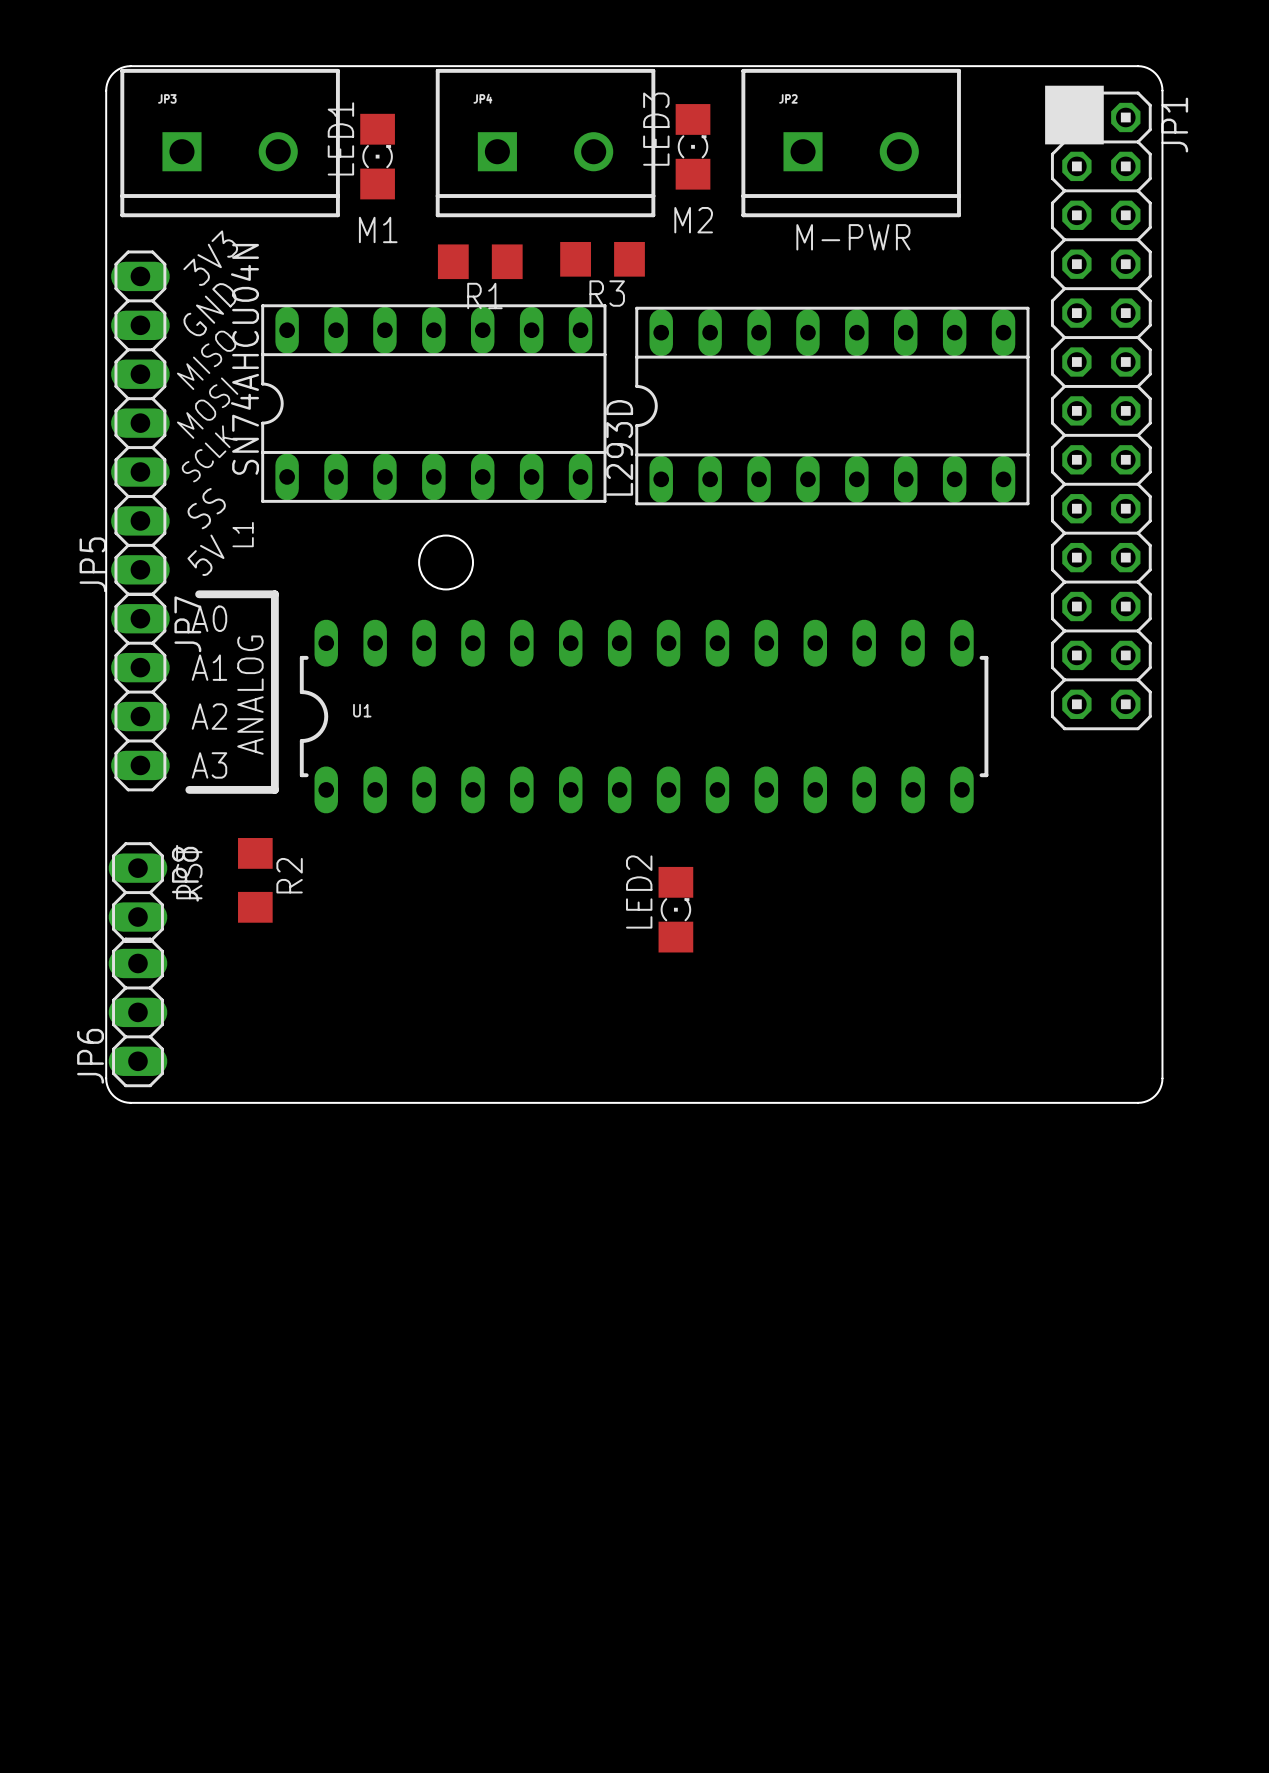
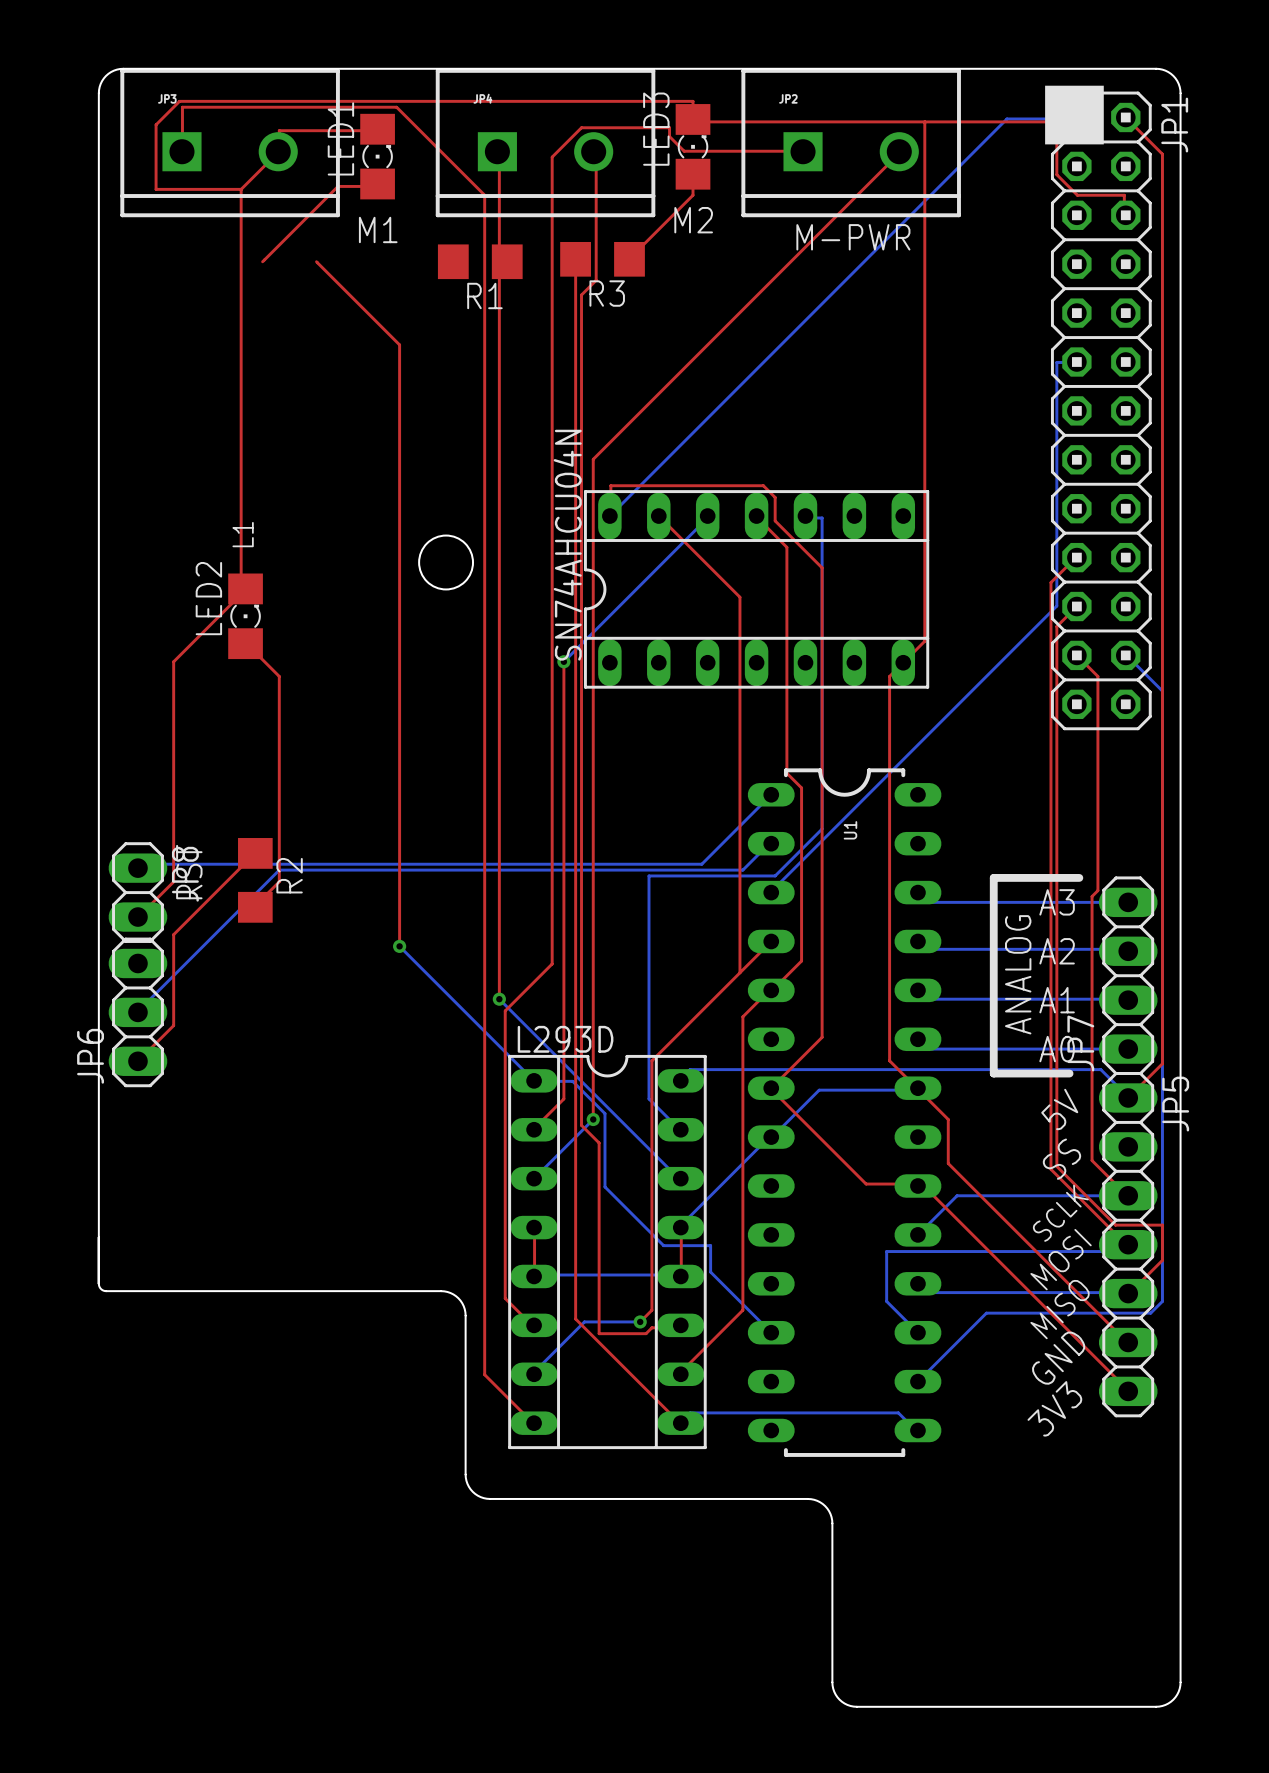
board edge: (130, 66) (1138, 66) (1147, 68) (1155, 73) (1160, 81) (1162, 90) (1162, 1078) (1160, 1087) (1155, 1095) (1147, 1101) (1138, 1102) (130, 1102) (121, 1101) (113, 1095) (108, 1087) (106, 1078) (106, 90) (108, 81) (113, 73) (121, 68) (130, 66) -> (123, 68) (113, 70) (106, 75) (100, 83) (98, 93) (99, 1287) (106, 1291) (441, 1291) (450, 1293) (460, 1300) (465, 1312) (465, 1477) (468, 1486) (477, 1495) (490, 1498) (807, 1498) (820, 1502) (829, 1511) (832, 1520) (832, 1685) (837, 1697) (850, 1705) (1156, 1706) (1168, 1703) (1177, 1694) (1180, 1682) (1180, 93) (1177, 81) (1168, 72) (1156, 68) (123, 68)
bottom track: none -> (1076, 117) (1006, 118) (609, 516)
top track: none -> (1125, 117) (1162, 154) (1162, 1063) (1128, 1097)
top track: none -> (924, 121) (924, 641) (889, 676) (889, 1060) (948, 1119) (948, 1163) (1128, 1342)
top track: none -> (377, 129) (279, 130) (279, 151) (241, 189)
top track: none -> (181, 151) (182, 107) (396, 107) (484, 195) (484, 1374) (534, 1423)
top track: none -> (497, 151) (499, 154) (499, 999)
top track: none -> (593, 151) (596, 154) (596, 280) (581, 295) (581, 1125) (599, 1142) (599, 1333) (646, 1333) (651, 1327) (678, 1327) (680, 1325)
top track: none -> (803, 151) (684, 151) (669, 136) (669, 127) (581, 127) (552, 157) (552, 963) (505, 1010) (505, 1298) (534, 1325)
top track: none -> (899, 151) (593, 459) (593, 1119)
top track: none -> (693, 174) (693, 195) (629, 259)
top track: none -> (377, 183) (376, 186) (337, 186) (262, 261)
top track: none -> (241, 189) (241, 594) (245, 588) (244, 591) (173, 661) (173, 881) (137, 917)
top track: none -> (241, 189) (156, 189) (156, 124) (179, 101) (693, 101) (693, 121) (1056, 121) (1056, 174) (1077, 195) (1124, 195) (1125, 215)
text: 3V3 (210, 258) -> none
top track: none -> (575, 259) (575, 1319) (680, 1423)
top track: none -> (316, 261) (399, 344) (399, 946)
text: GND (210, 309) -> none
text: MISO (206, 360) -> none
bottom track: none -> (1076, 362) (1056, 362) (1056, 606) (771, 892)
SN74AHCU04N position: (433, 403) -> (756, 589)
L293D rotation: 0° (832, 406) -> 90° clockwise (607, 1252)
L293D position: (832, 406) -> (607, 1252)
text: MOSI (207, 408) -> none
JP5 position: (140, 423) -> (1128, 1244)
text: SCLK (209, 453) -> none
text: SS (206, 508) -> none
top track: none -> (609, 516) (610, 485) (763, 485) (775, 497) (775, 520) (822, 567) (822, 1037) (771, 1088) (866, 1184) (916, 1184) (918, 1186) (924, 1186) (1128, 1391)
top track: none -> (658, 516) (739, 597) (739, 972)
bottom track: none -> (707, 516) (563, 661)
top track: none -> (756, 516) (786, 547) (786, 773) (801, 787) (801, 961) (742, 1016) (742, 1310) (680, 1374)
bottom track: none -> (805, 516) (807, 518) (822, 518) (822, 829) (775, 875) (649, 875) (649, 1098) (680, 1129)
text: 5V (205, 555) -> none
top track: none -> (1076, 557) (1050, 582) (1050, 1169) (1128, 1244)
JP5 name position: JP5 (92, 564) -> JP5 (1175, 1104)
line: (199, 594) (274, 594) (274, 789) (189, 789) -> none
top track: none -> (1076, 606) (1056, 626) (1056, 1166) (1115, 1225) (1162, 1225) (1162, 1260) (1128, 1293)
text: A0 (209, 618) -> none
JP7 name position: JP7 (187, 624) -> JP7 (1080, 1043)
top track: none -> (245, 643) (279, 676) (279, 881) (255, 907)
top track: none -> (1076, 655) (1097, 676) (1097, 890) (1092, 896) (1092, 1160) (1128, 1195)
bottom track: none -> (1125, 655) (1162, 691) (1162, 1301) (1150, 1313) (986, 1313) (917, 1381)
top track: none -> (563, 661) (563, 1098) (534, 1129)
via: none -> (563, 661)
text: A1 (209, 667) -> none
JP7 position: (140, 692) -> (1128, 975)
text: ANALOG (250, 695) -> none
text: A2 (209, 716) -> none
U1 rotation: 0° (644, 716) -> 90° clockwise (844, 1112)
U1 position: (644, 716) -> (844, 1112)
text: A3 (209, 765) -> none
bottom track: none -> (771, 794) (701, 864) (141, 864) (137, 868)
bottom track: none -> (771, 843) (742, 870) (279, 870) (137, 1012)
top track: none -> (255, 853) (173, 934) (173, 1025) (137, 1061)
line: none -> (1079, 877) (993, 877) (993, 1073) (1069, 1073)
bottom track: none -> (917, 892) (927, 902) (1128, 902)
text: none -> A3 (1057, 902)
LED2 position: (675, 909) -> (245, 616)
top track: none -> (771, 941) (651, 1060) (651, 1310) (640, 1321)
bottom track: none -> (917, 941) (924, 949) (1127, 949) (1128, 951)
bottom track: none -> (399, 946) (534, 1081) (572, 1081) (604, 1113) (604, 1186) (663, 1245) (710, 1245) (710, 1272) (771, 1332)
via: none -> (399, 946)
text: none -> A2 (1057, 951)
text: none -> ANALOG (1018, 974)
bottom track: none -> (917, 990) (927, 999) (1128, 1000)
bottom track: none -> (499, 999) (680, 1178)
via: none -> (499, 999)
text: none -> A1 (1057, 1000)
bottom track: none -> (917, 1039) (927, 1049) (1128, 1049)
text: none -> A0 (1057, 1049)
bottom track: none -> (680, 1080) (690, 1069) (1100, 1069) (1128, 1097)
bottom track: none -> (917, 1088) (916, 1090) (819, 1090) (772, 1137) (769, 1137) (680, 1227)
text: none -> 5V (1059, 1109)
bottom track: none -> (593, 1119) (534, 1178)
via: none -> (593, 1119)
text: none -> SS (1061, 1159)
bottom track: none -> (1128, 1195) (957, 1195) (917, 1234)
text: none -> SCLK (1060, 1213)
top track: none -> (534, 1227) (534, 1276)
top track: none -> (680, 1227) (680, 1276)
bottom track: none -> (1128, 1244) (1121, 1251) (886, 1251) (886, 1301) (917, 1332)
text: none -> MOSI (1061, 1259)
bottom track: none -> (534, 1276) (680, 1276)
bottom track: none -> (917, 1283) (927, 1292) (1128, 1293)
text: none -> MISO (1060, 1309)
bottom track: none -> (640, 1321) (584, 1321) (534, 1374)
via: none -> (640, 1321)
text: none -> GND (1058, 1358)
text: none -> 3V3 (1054, 1408)
bottom track: none -> (680, 1423) (690, 1412) (898, 1412) (917, 1430)

